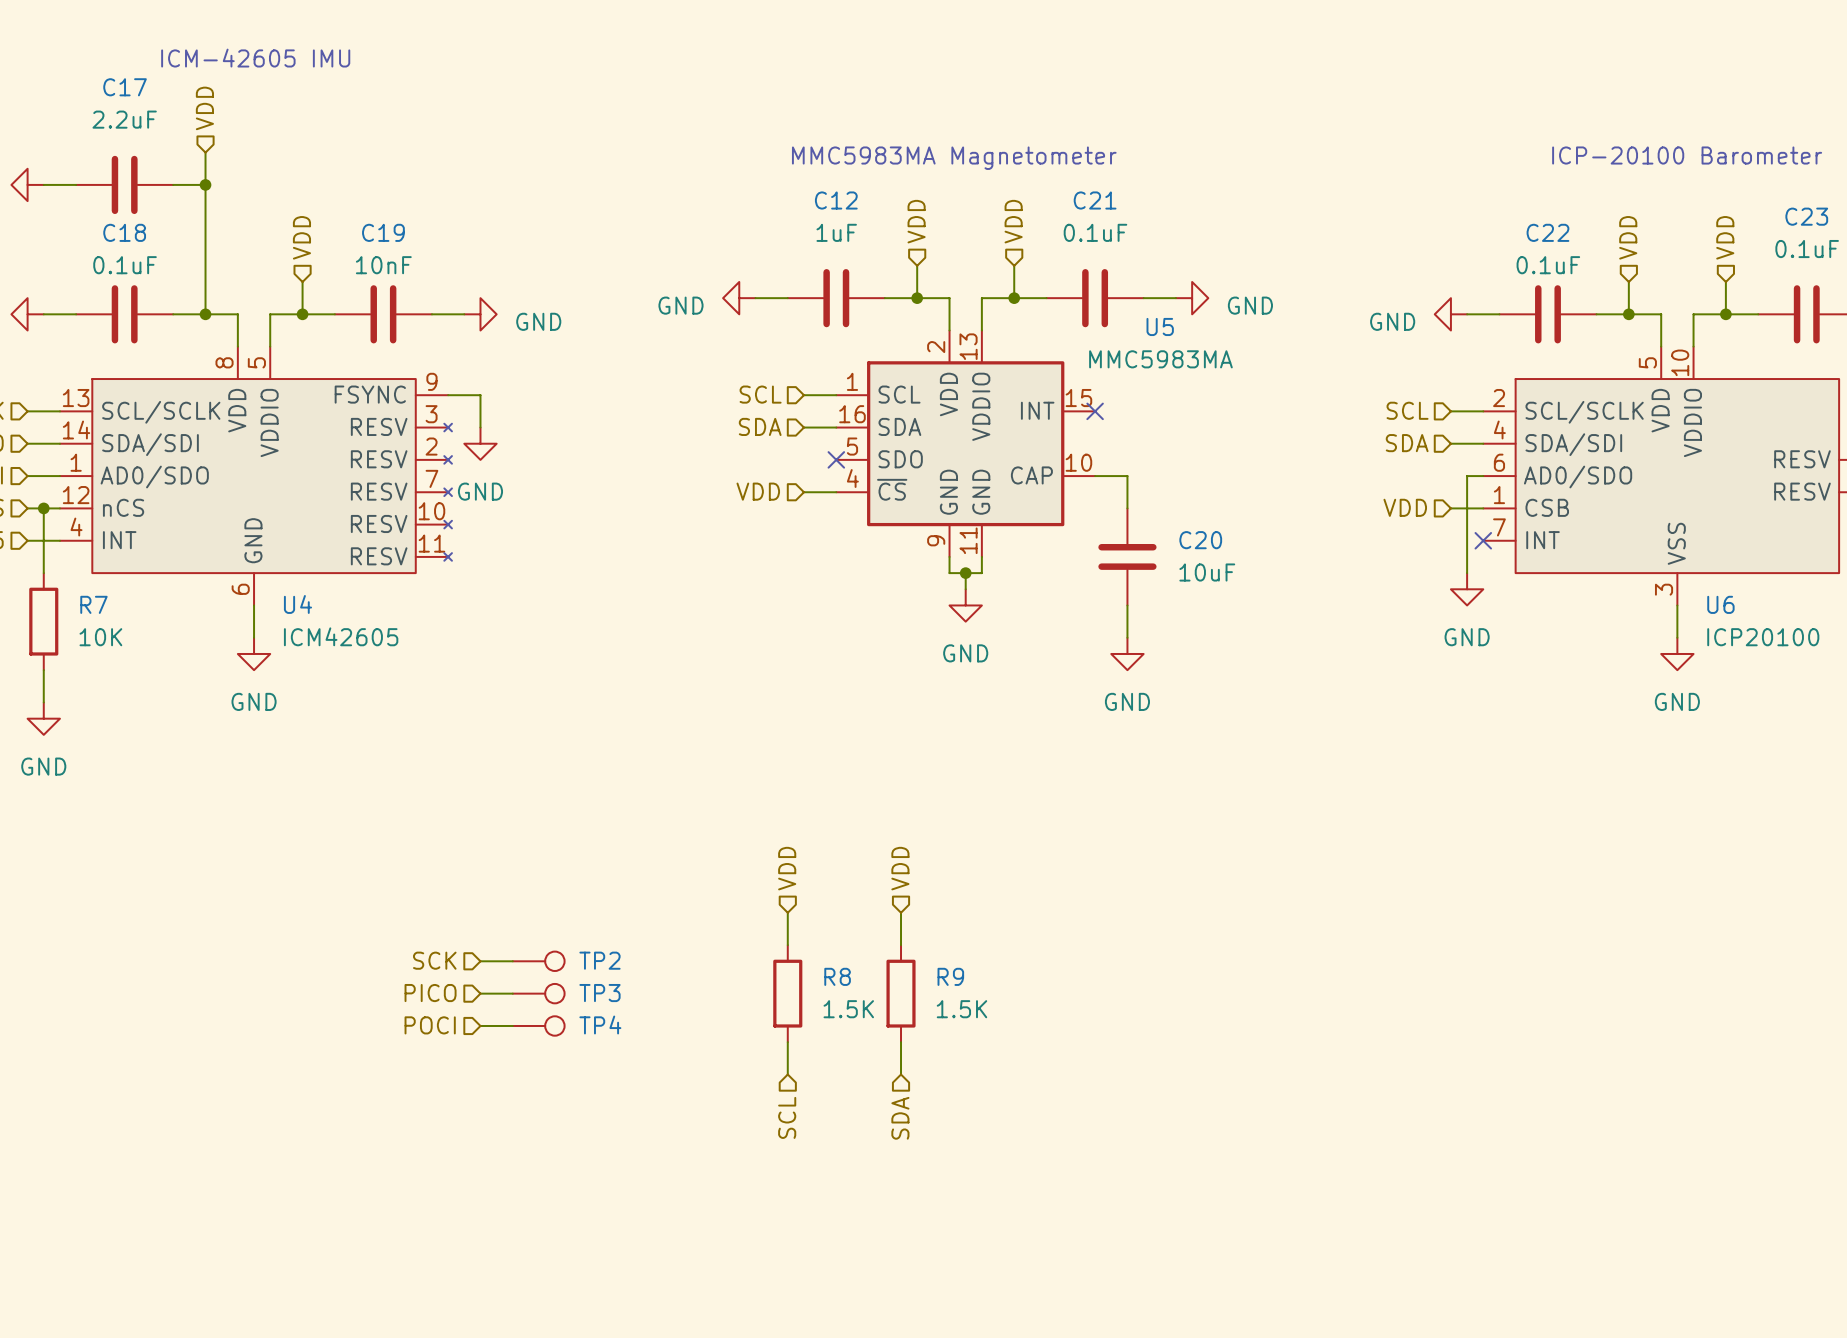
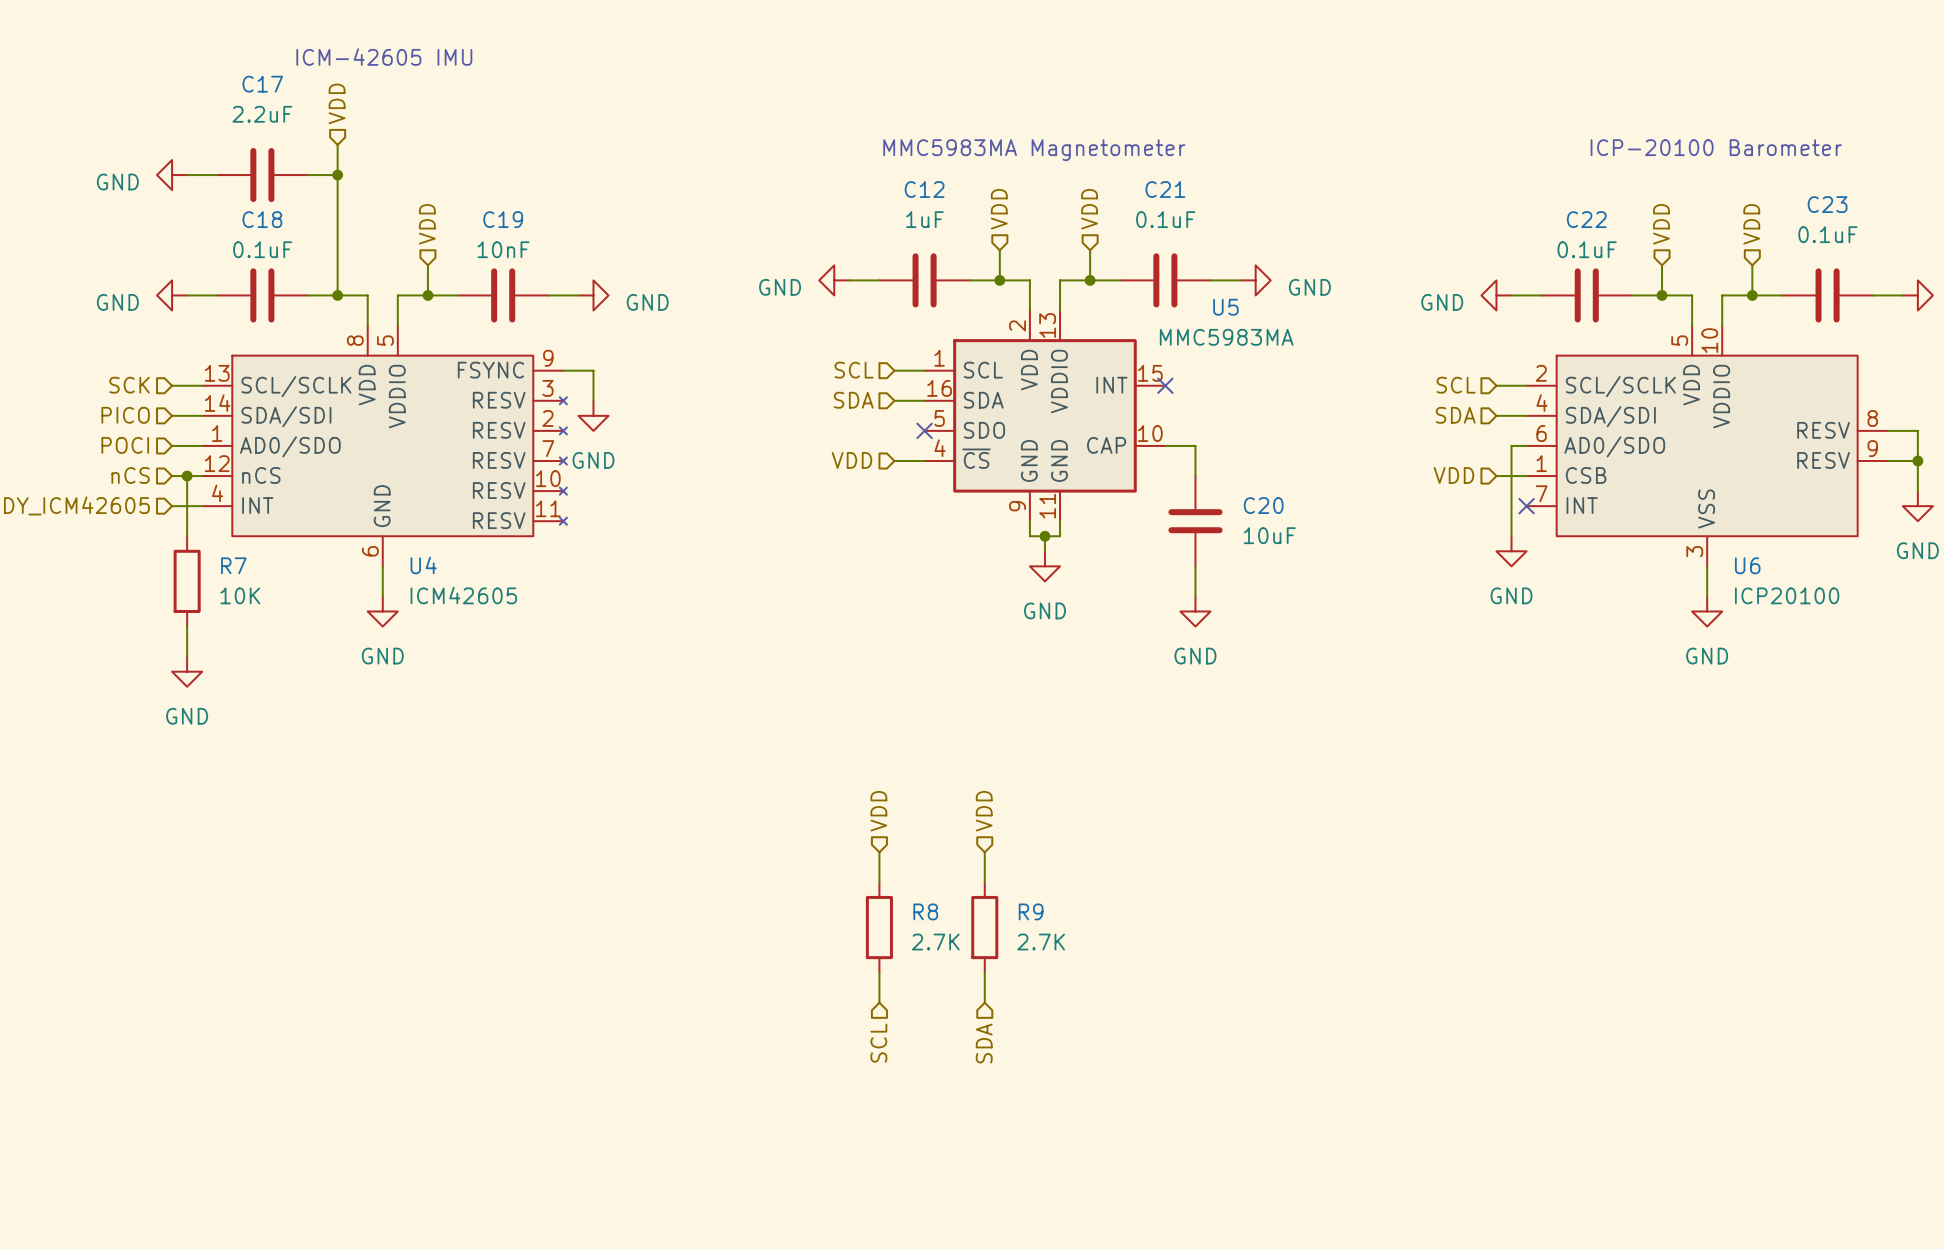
hierarchical label: SCK (434, 960) -> none
wire: (480, 961) (512, 961) -> none
TP2: (538, 961) -> none
hierarchical label: PICO (430, 993) -> none
wire: (480, 993) (512, 993) -> none
TP3: (538, 993) -> none
R8 value: 1.5K (848, 1009) -> 2.7K (935, 942)
R9 value: 1.5K (961, 1009) -> 2.7K (1041, 942)
hierarchical label: POCI (430, 1025) -> none
wire: (480, 1025) (512, 1025) -> none
TP4: (538, 1025) -> none

